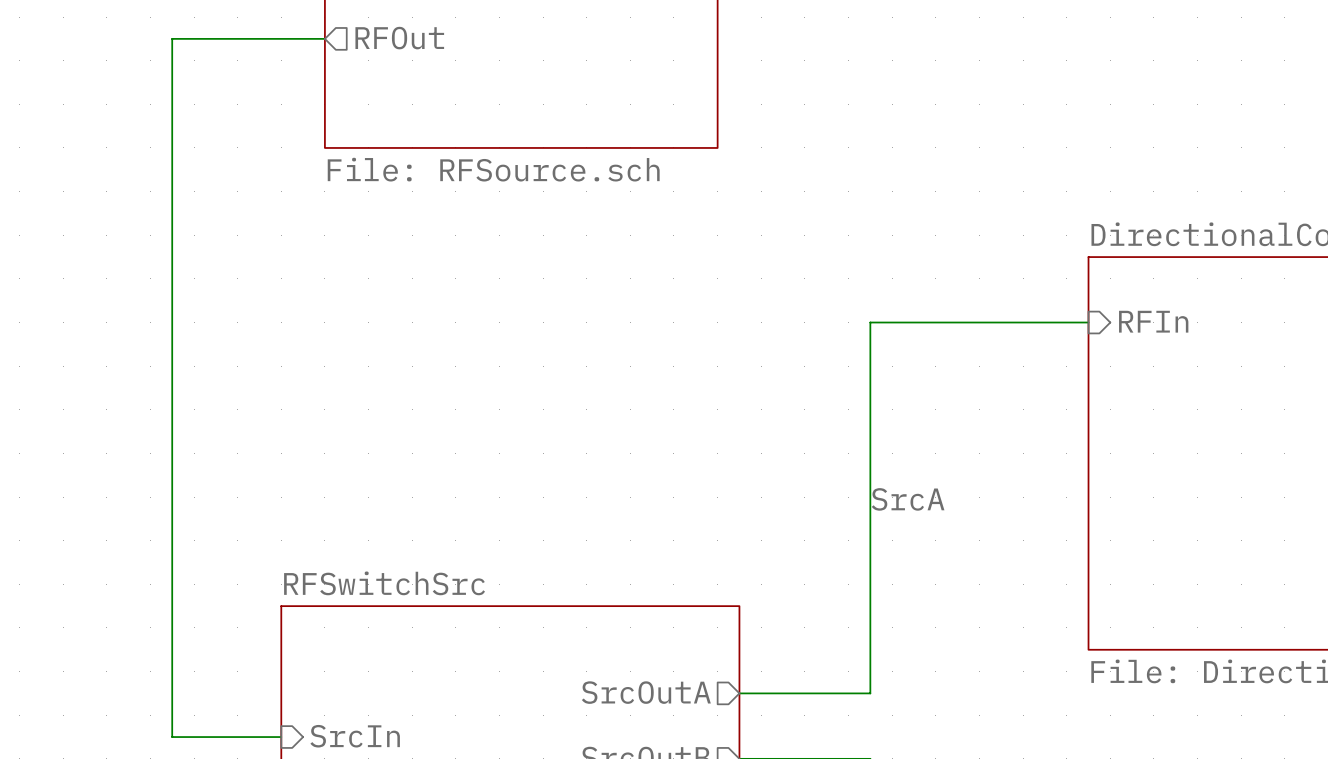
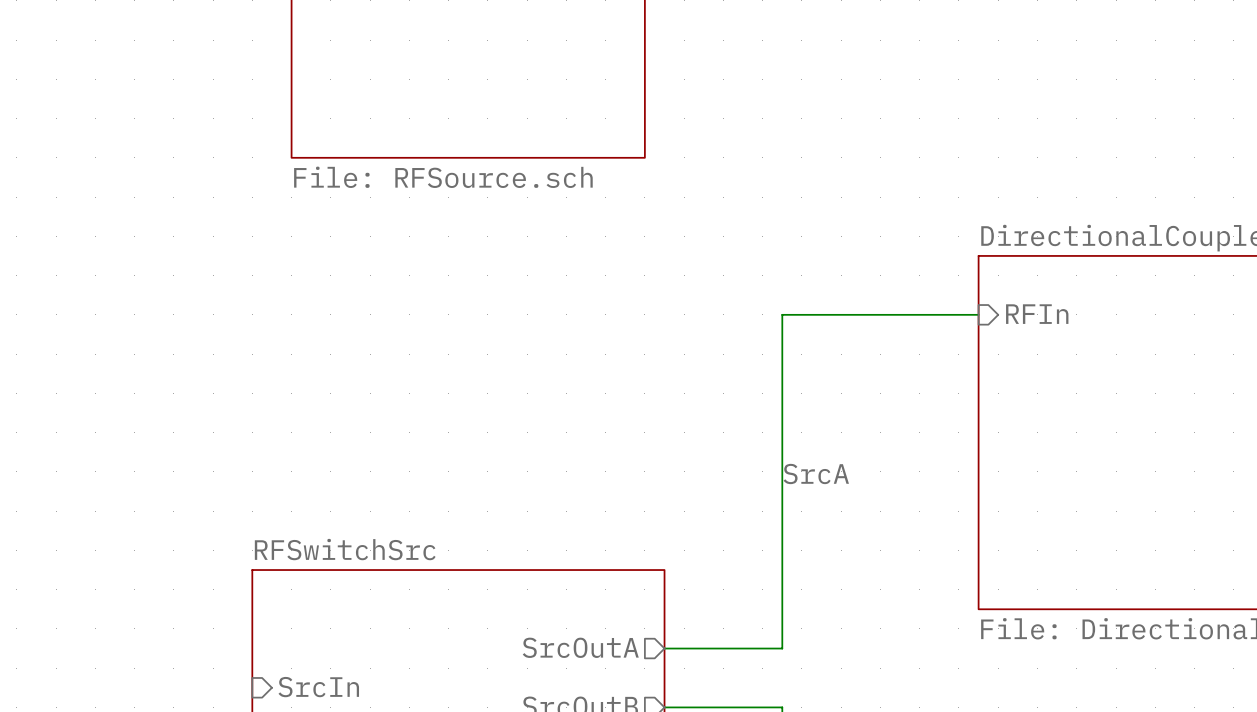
wire: (324, 38) (172, 38) (172, 737) (281, 737) -> none
sheet pin: RFOut (399, 38) -> none

